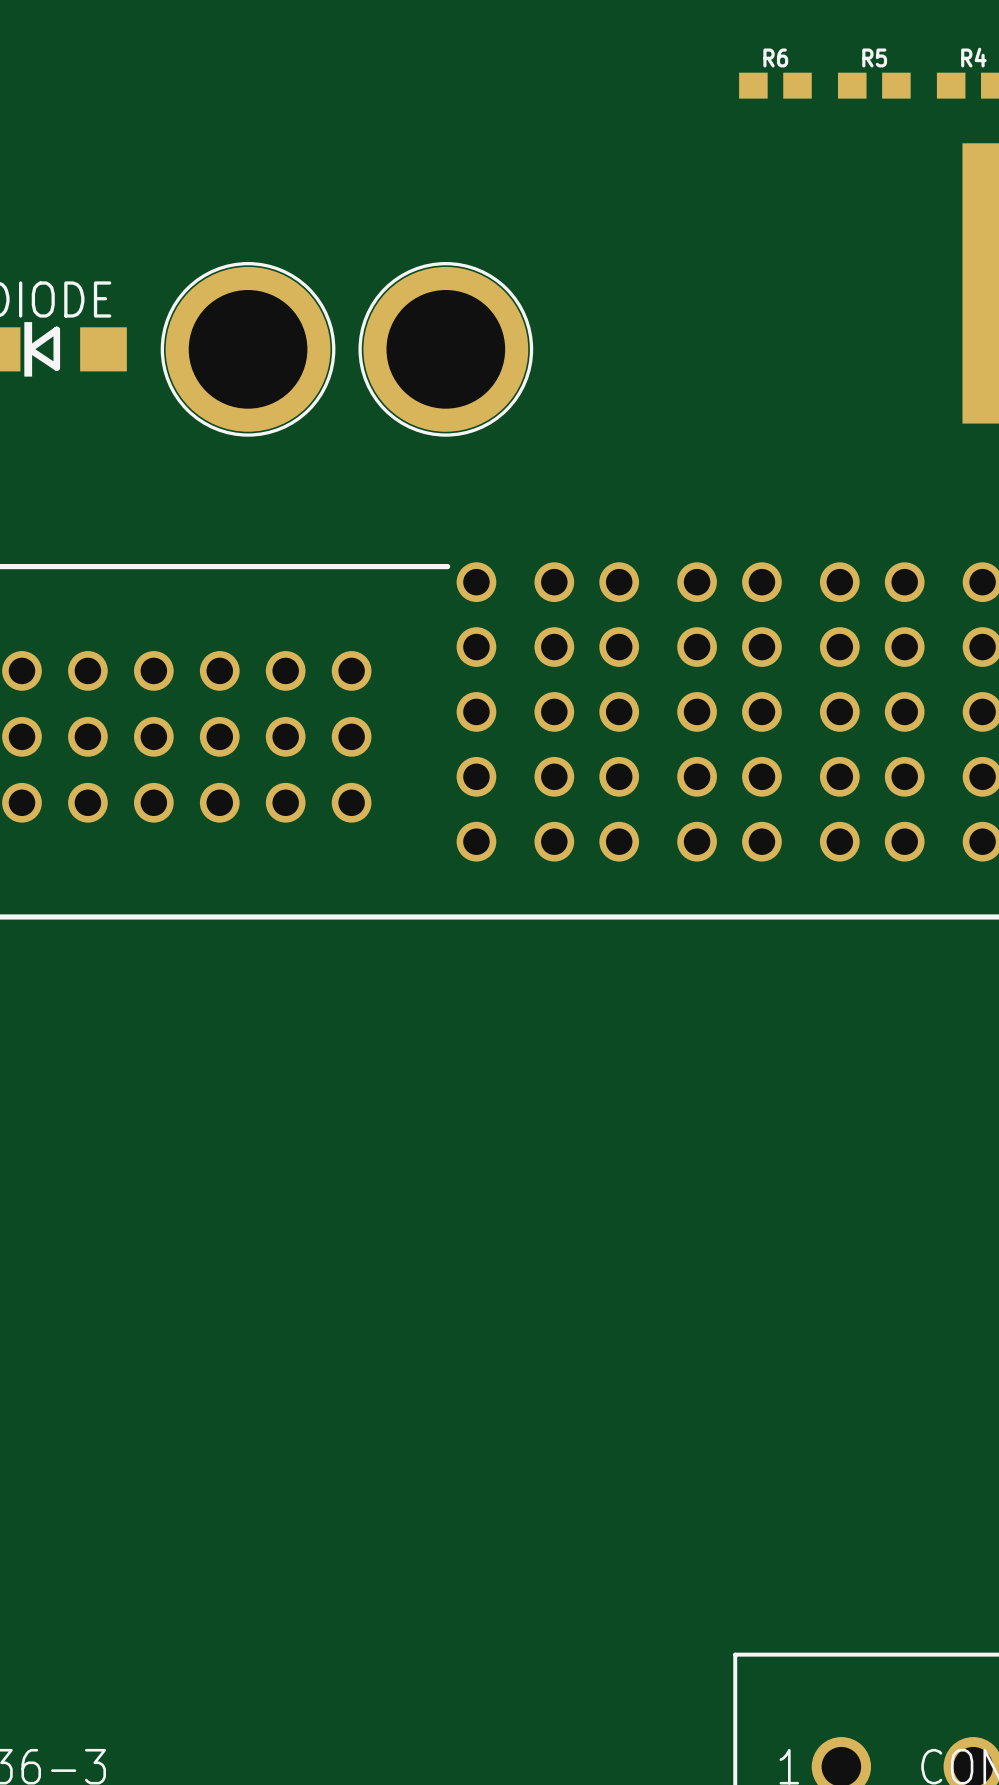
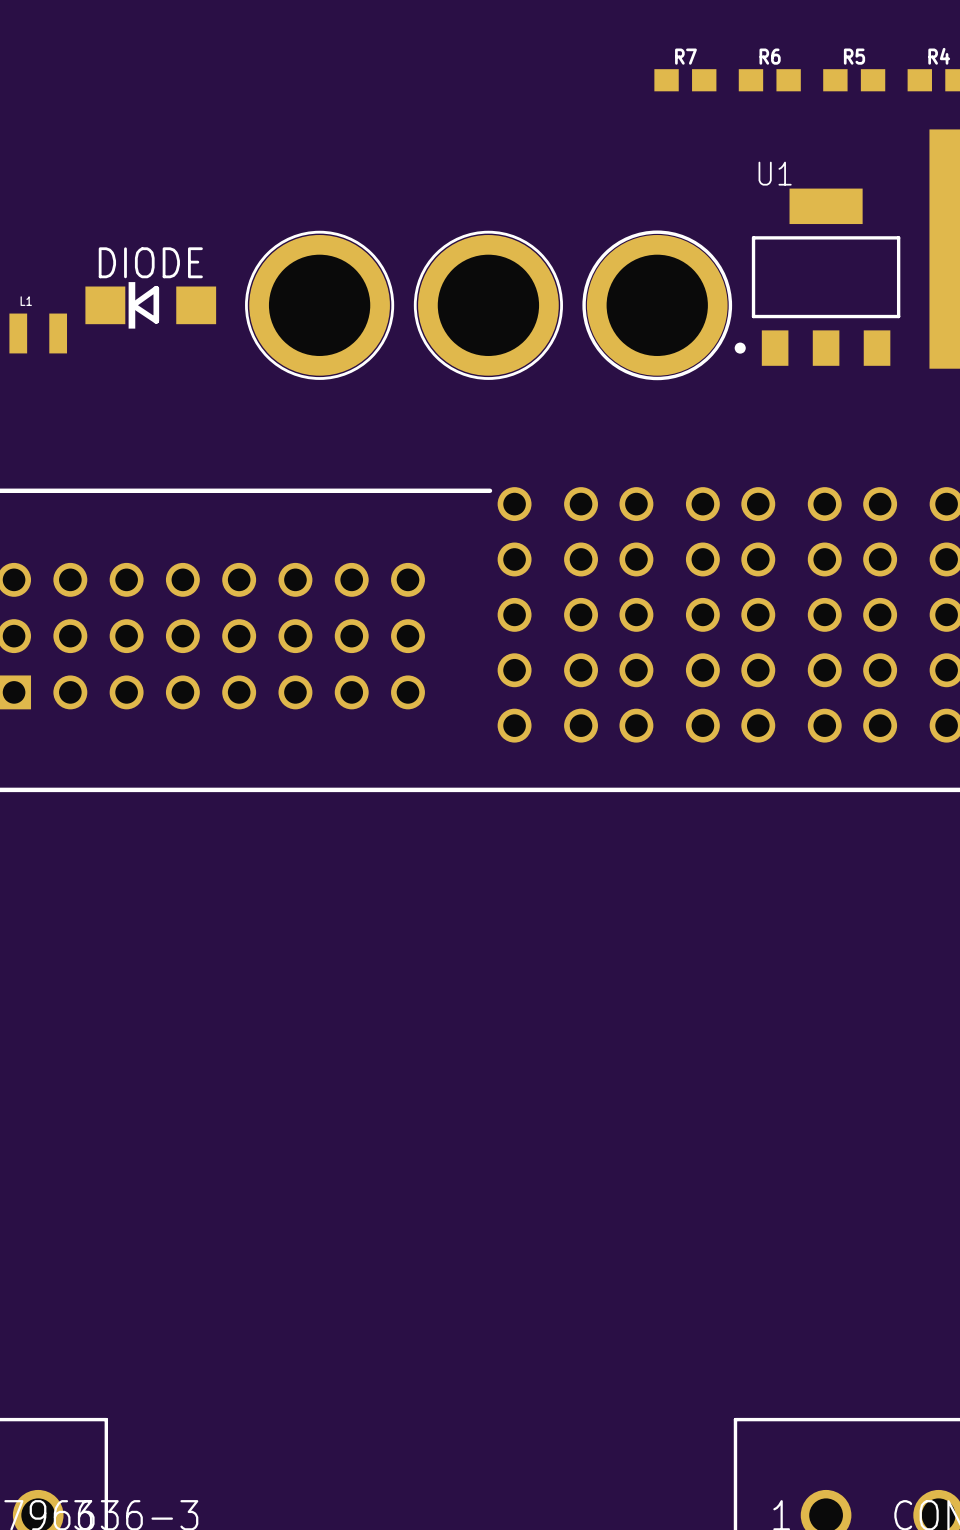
R7: none -> (685, 80)
U1: none -> (817, 277)
part: none -> (657, 305)

